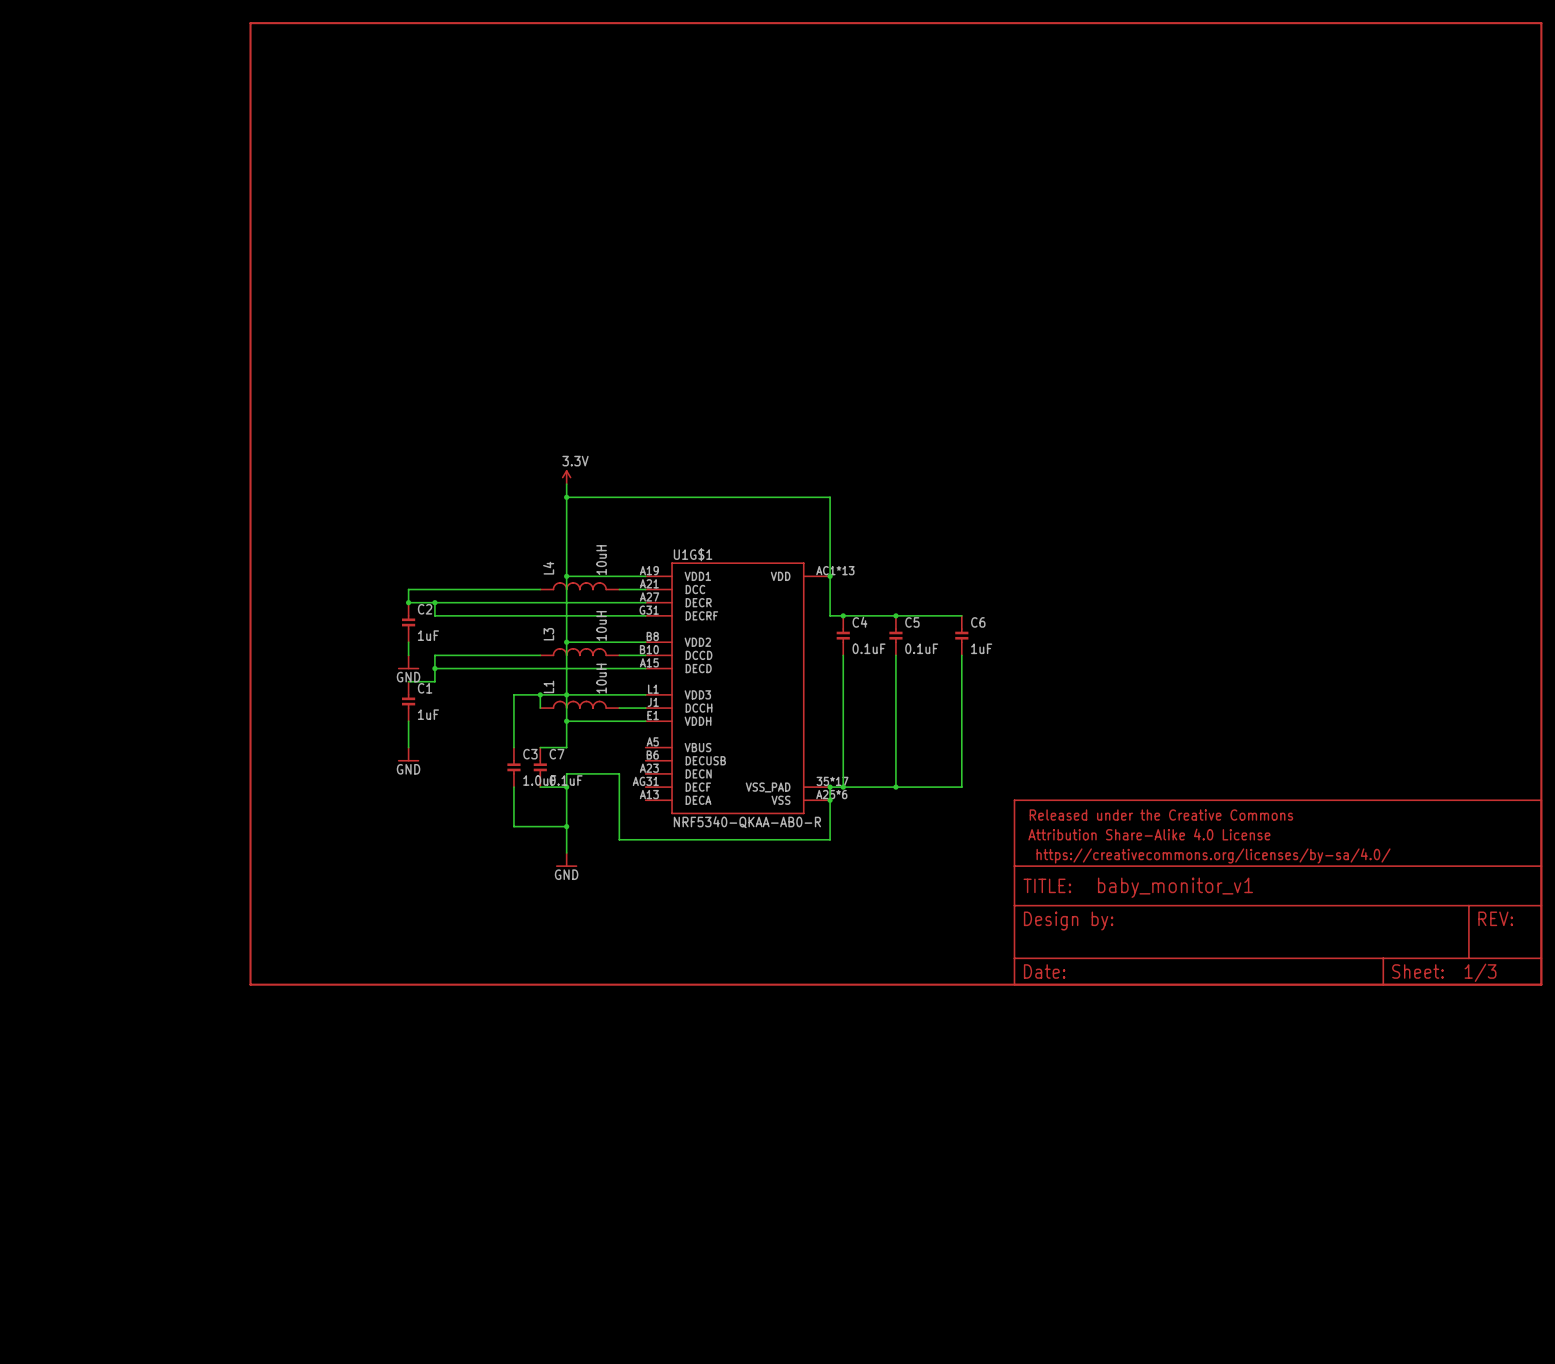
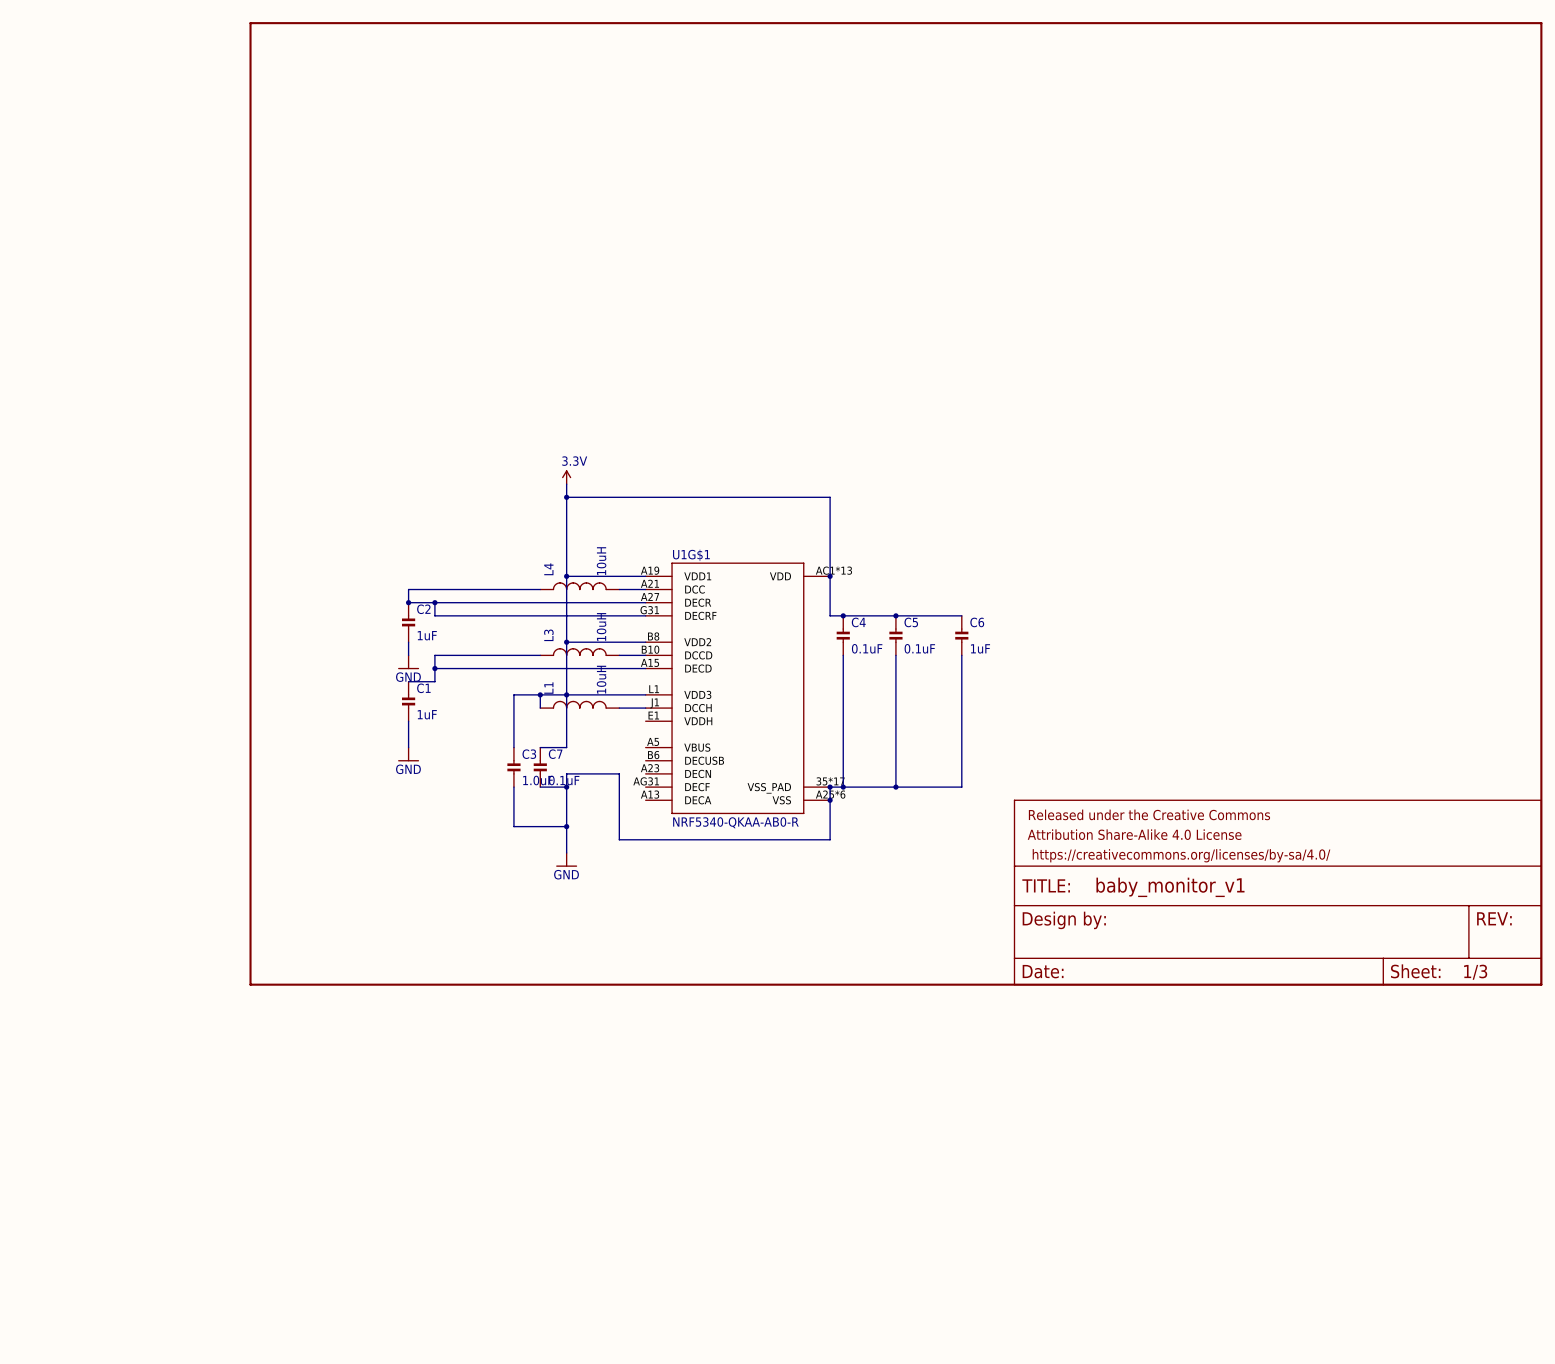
wire: (566, 721) (645, 721) -> none
junction: (566, 721) -> none

